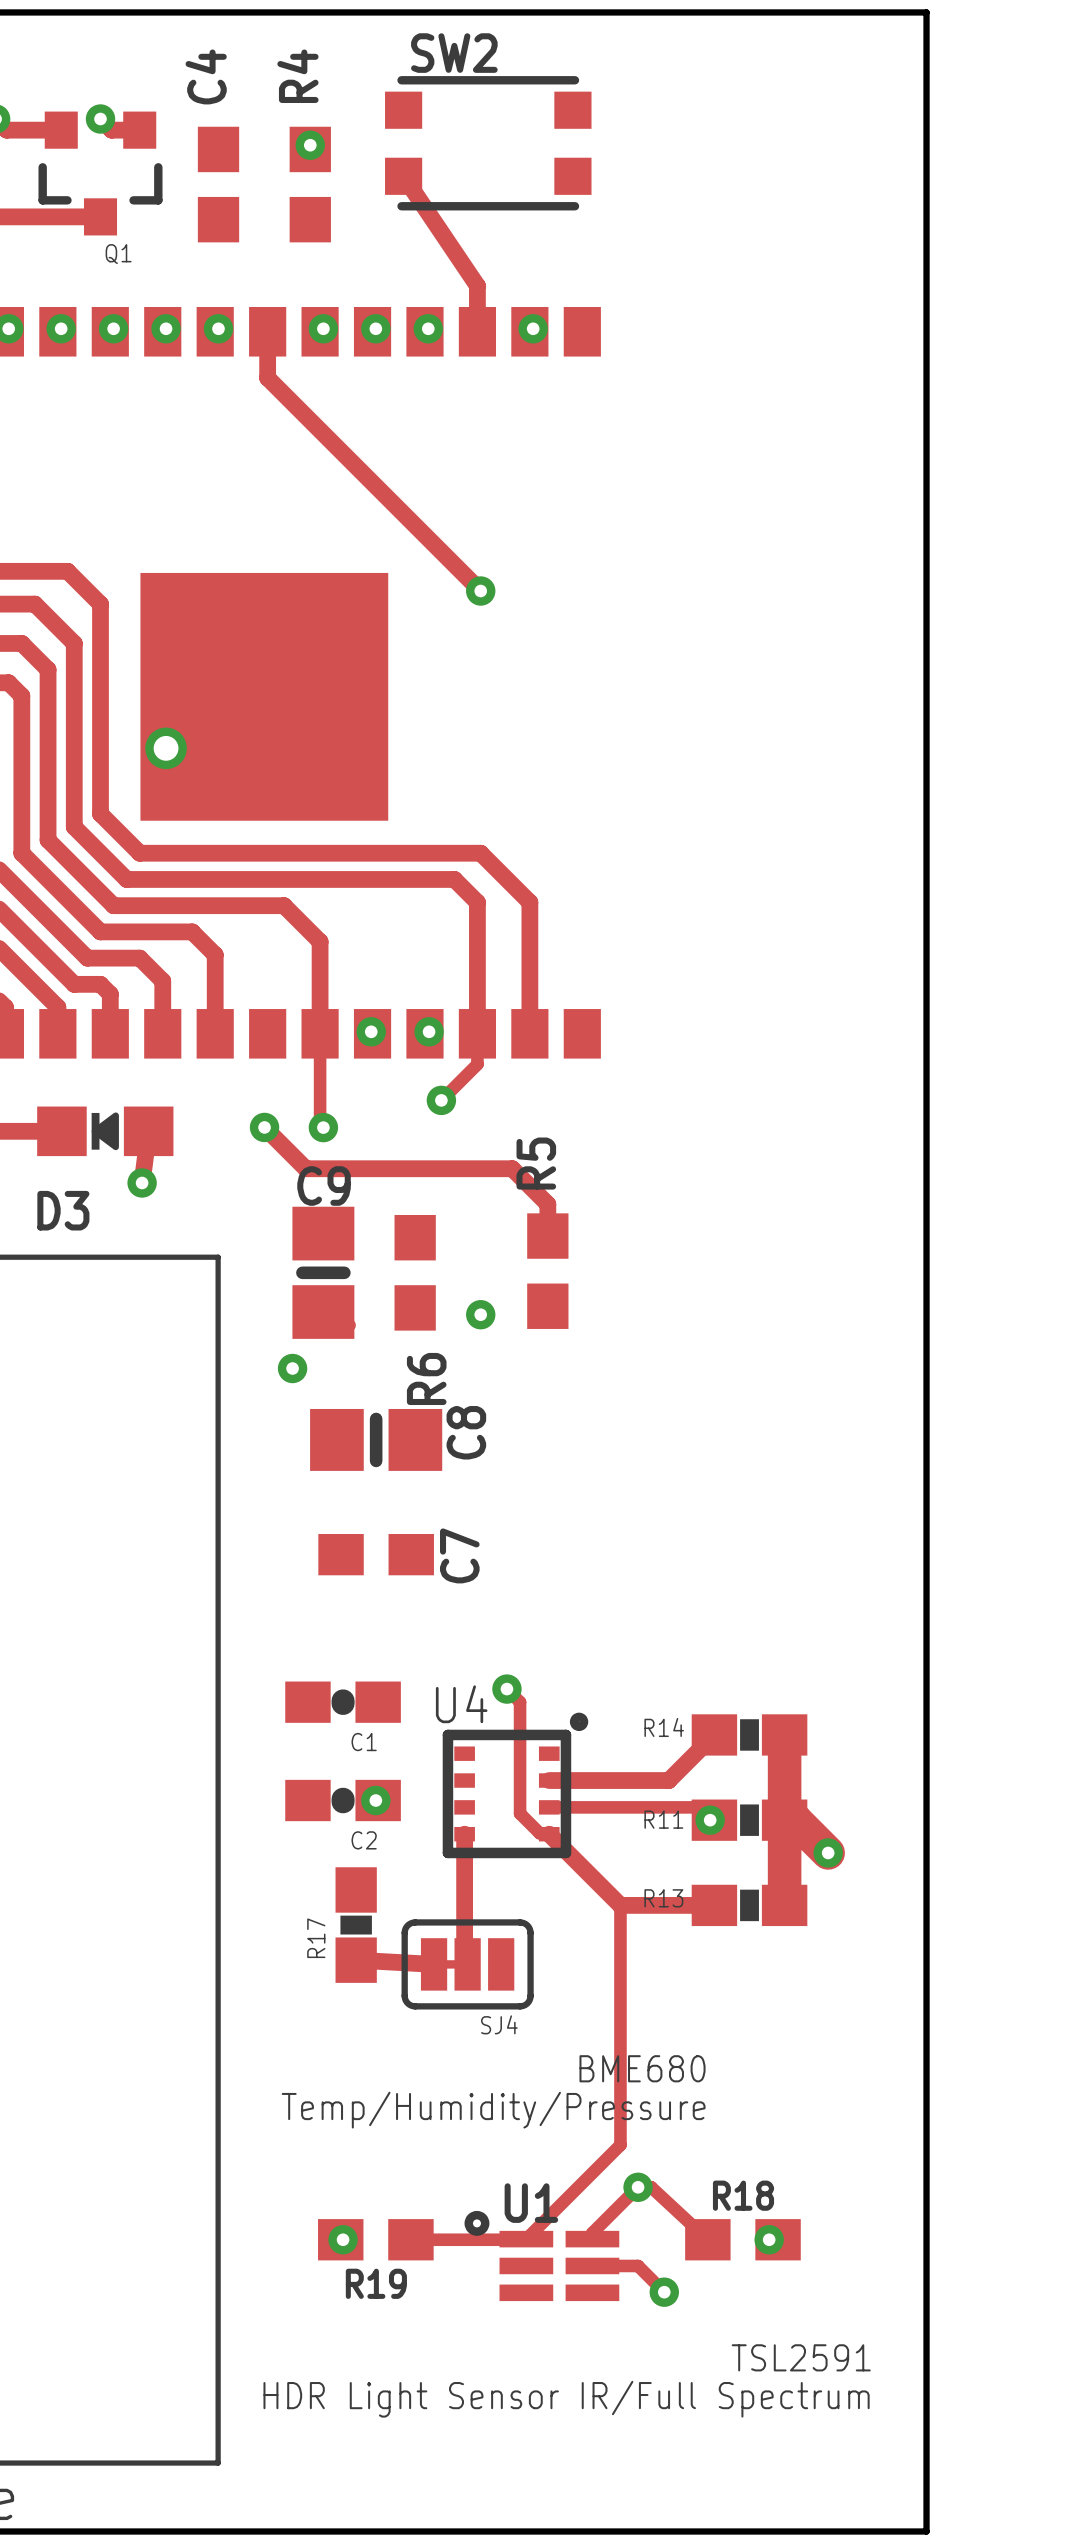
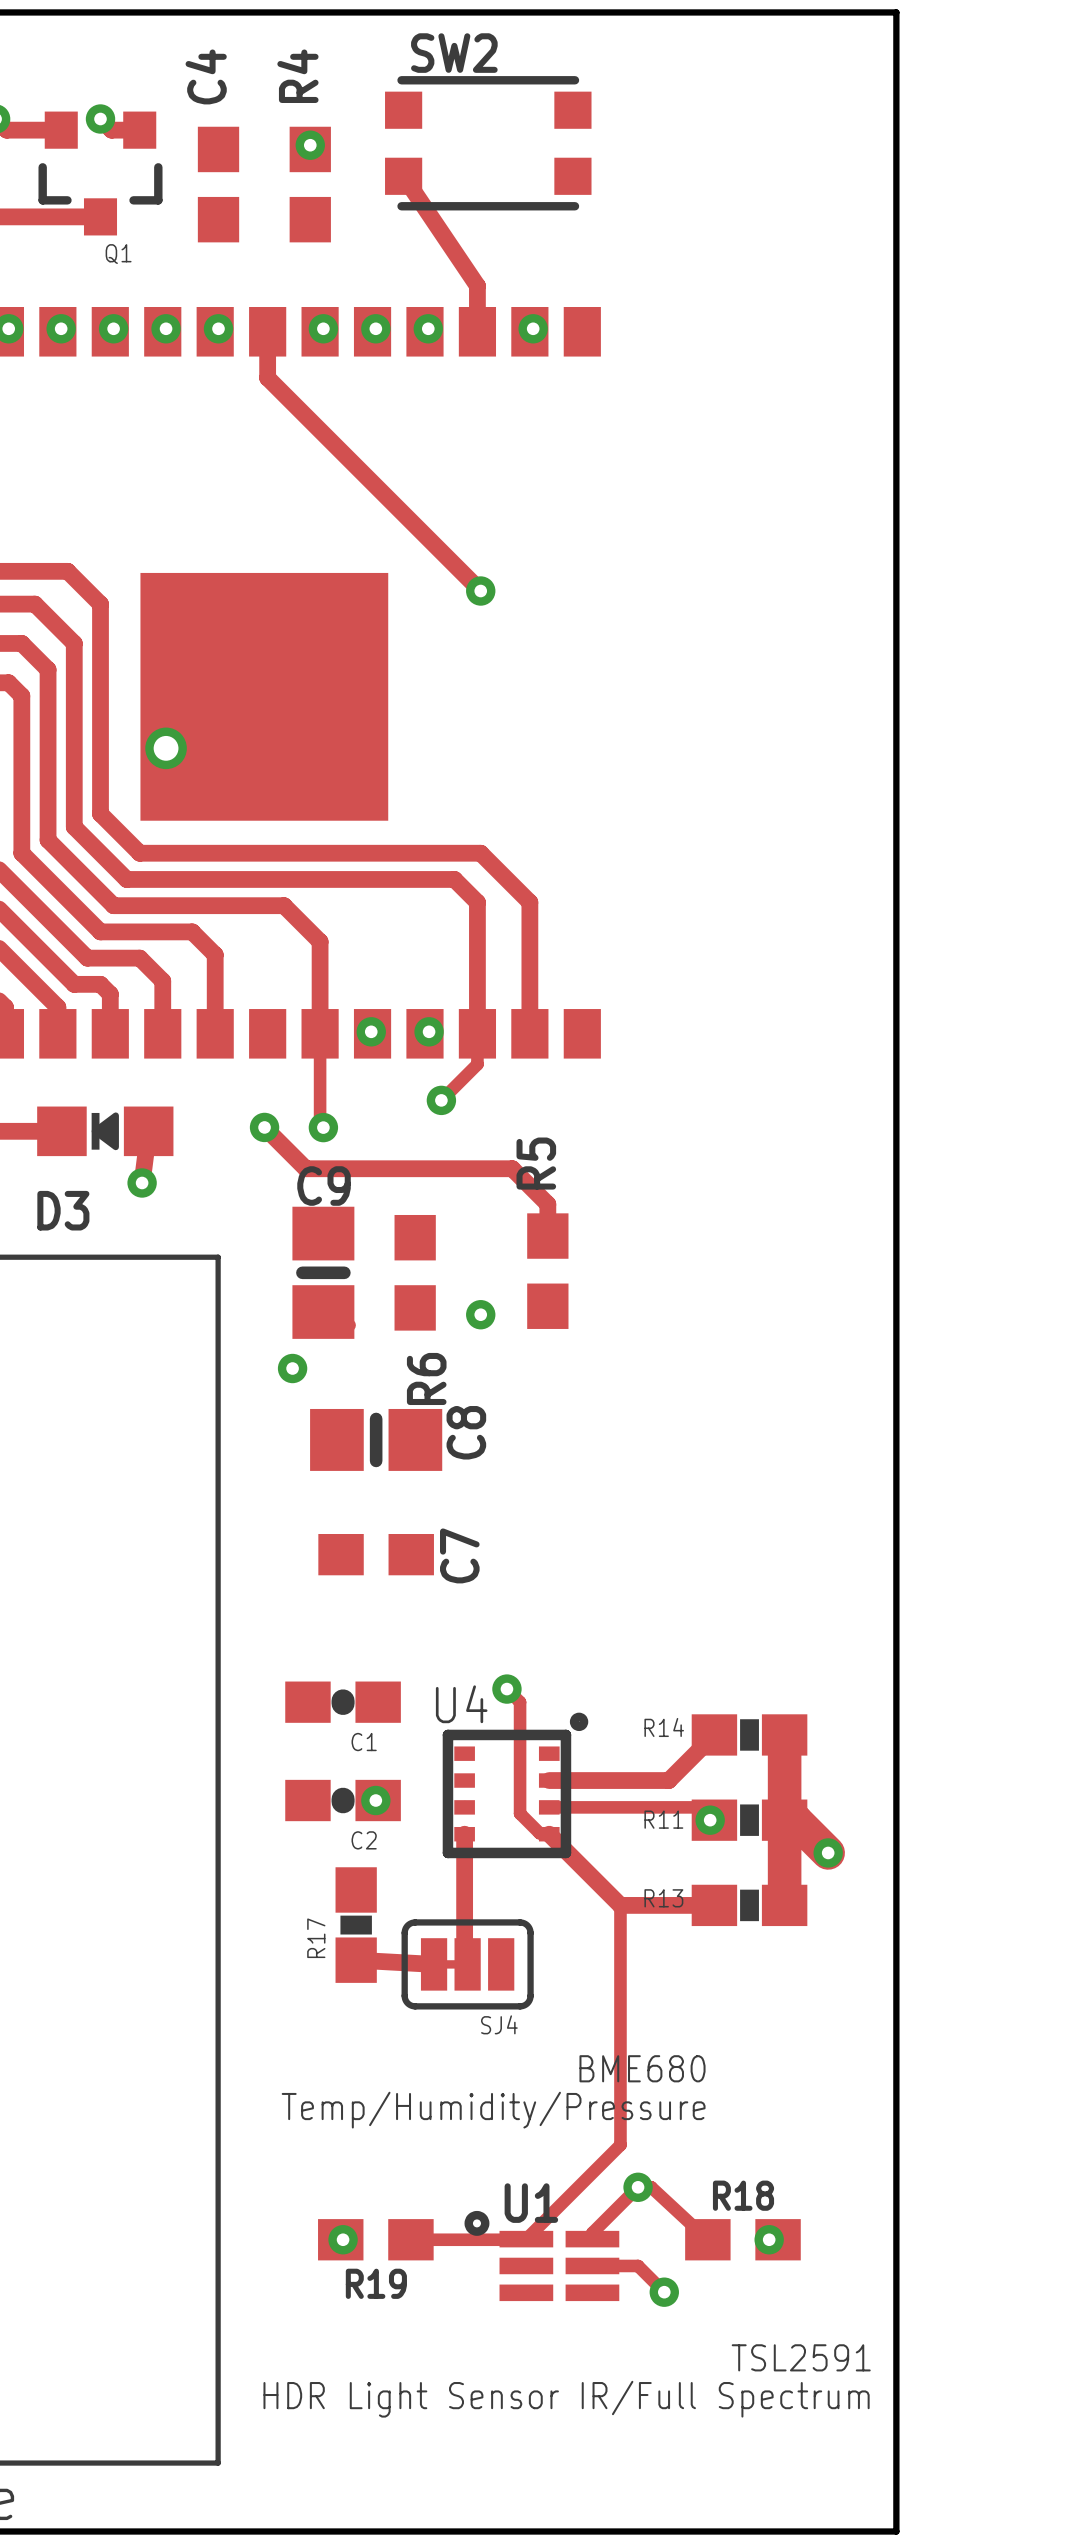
board edge: (896, 12) (926, 12) (926, 2531) (896, 2531) -> (896, 12) (896, 2531)

